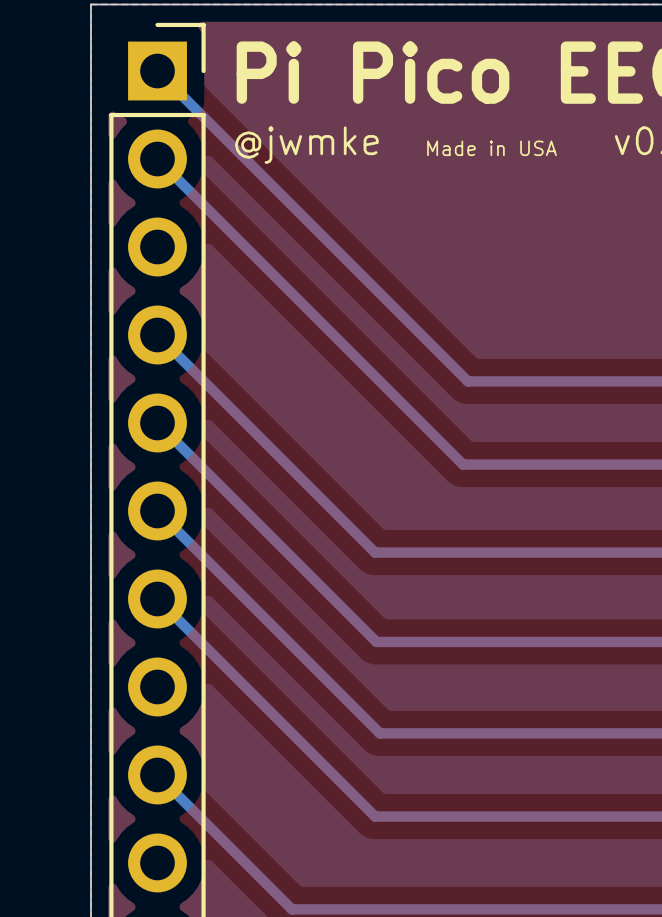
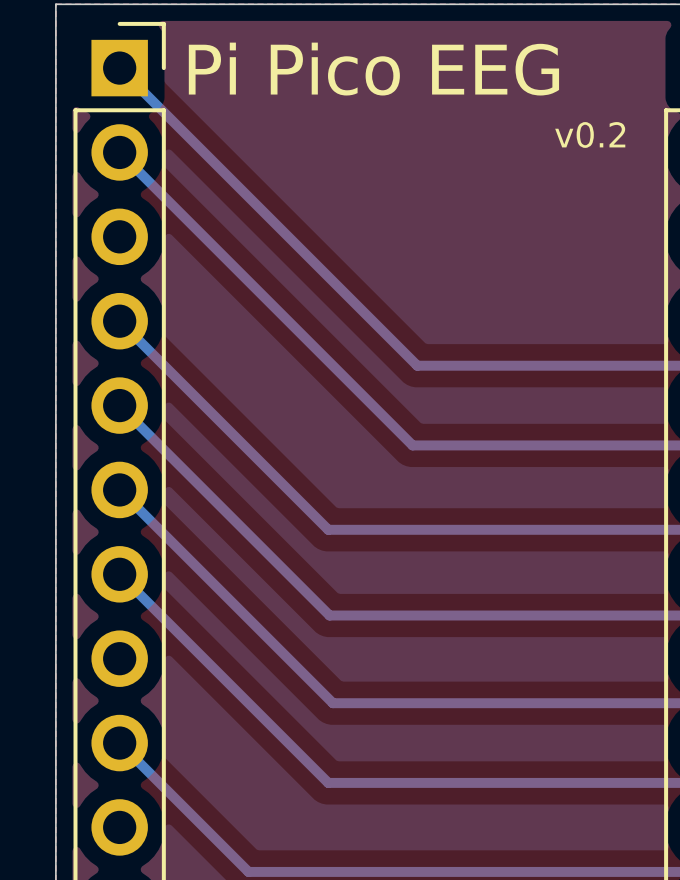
text: @jwmke (306, 145) -> none
text: Made in USA (492, 148) -> none

